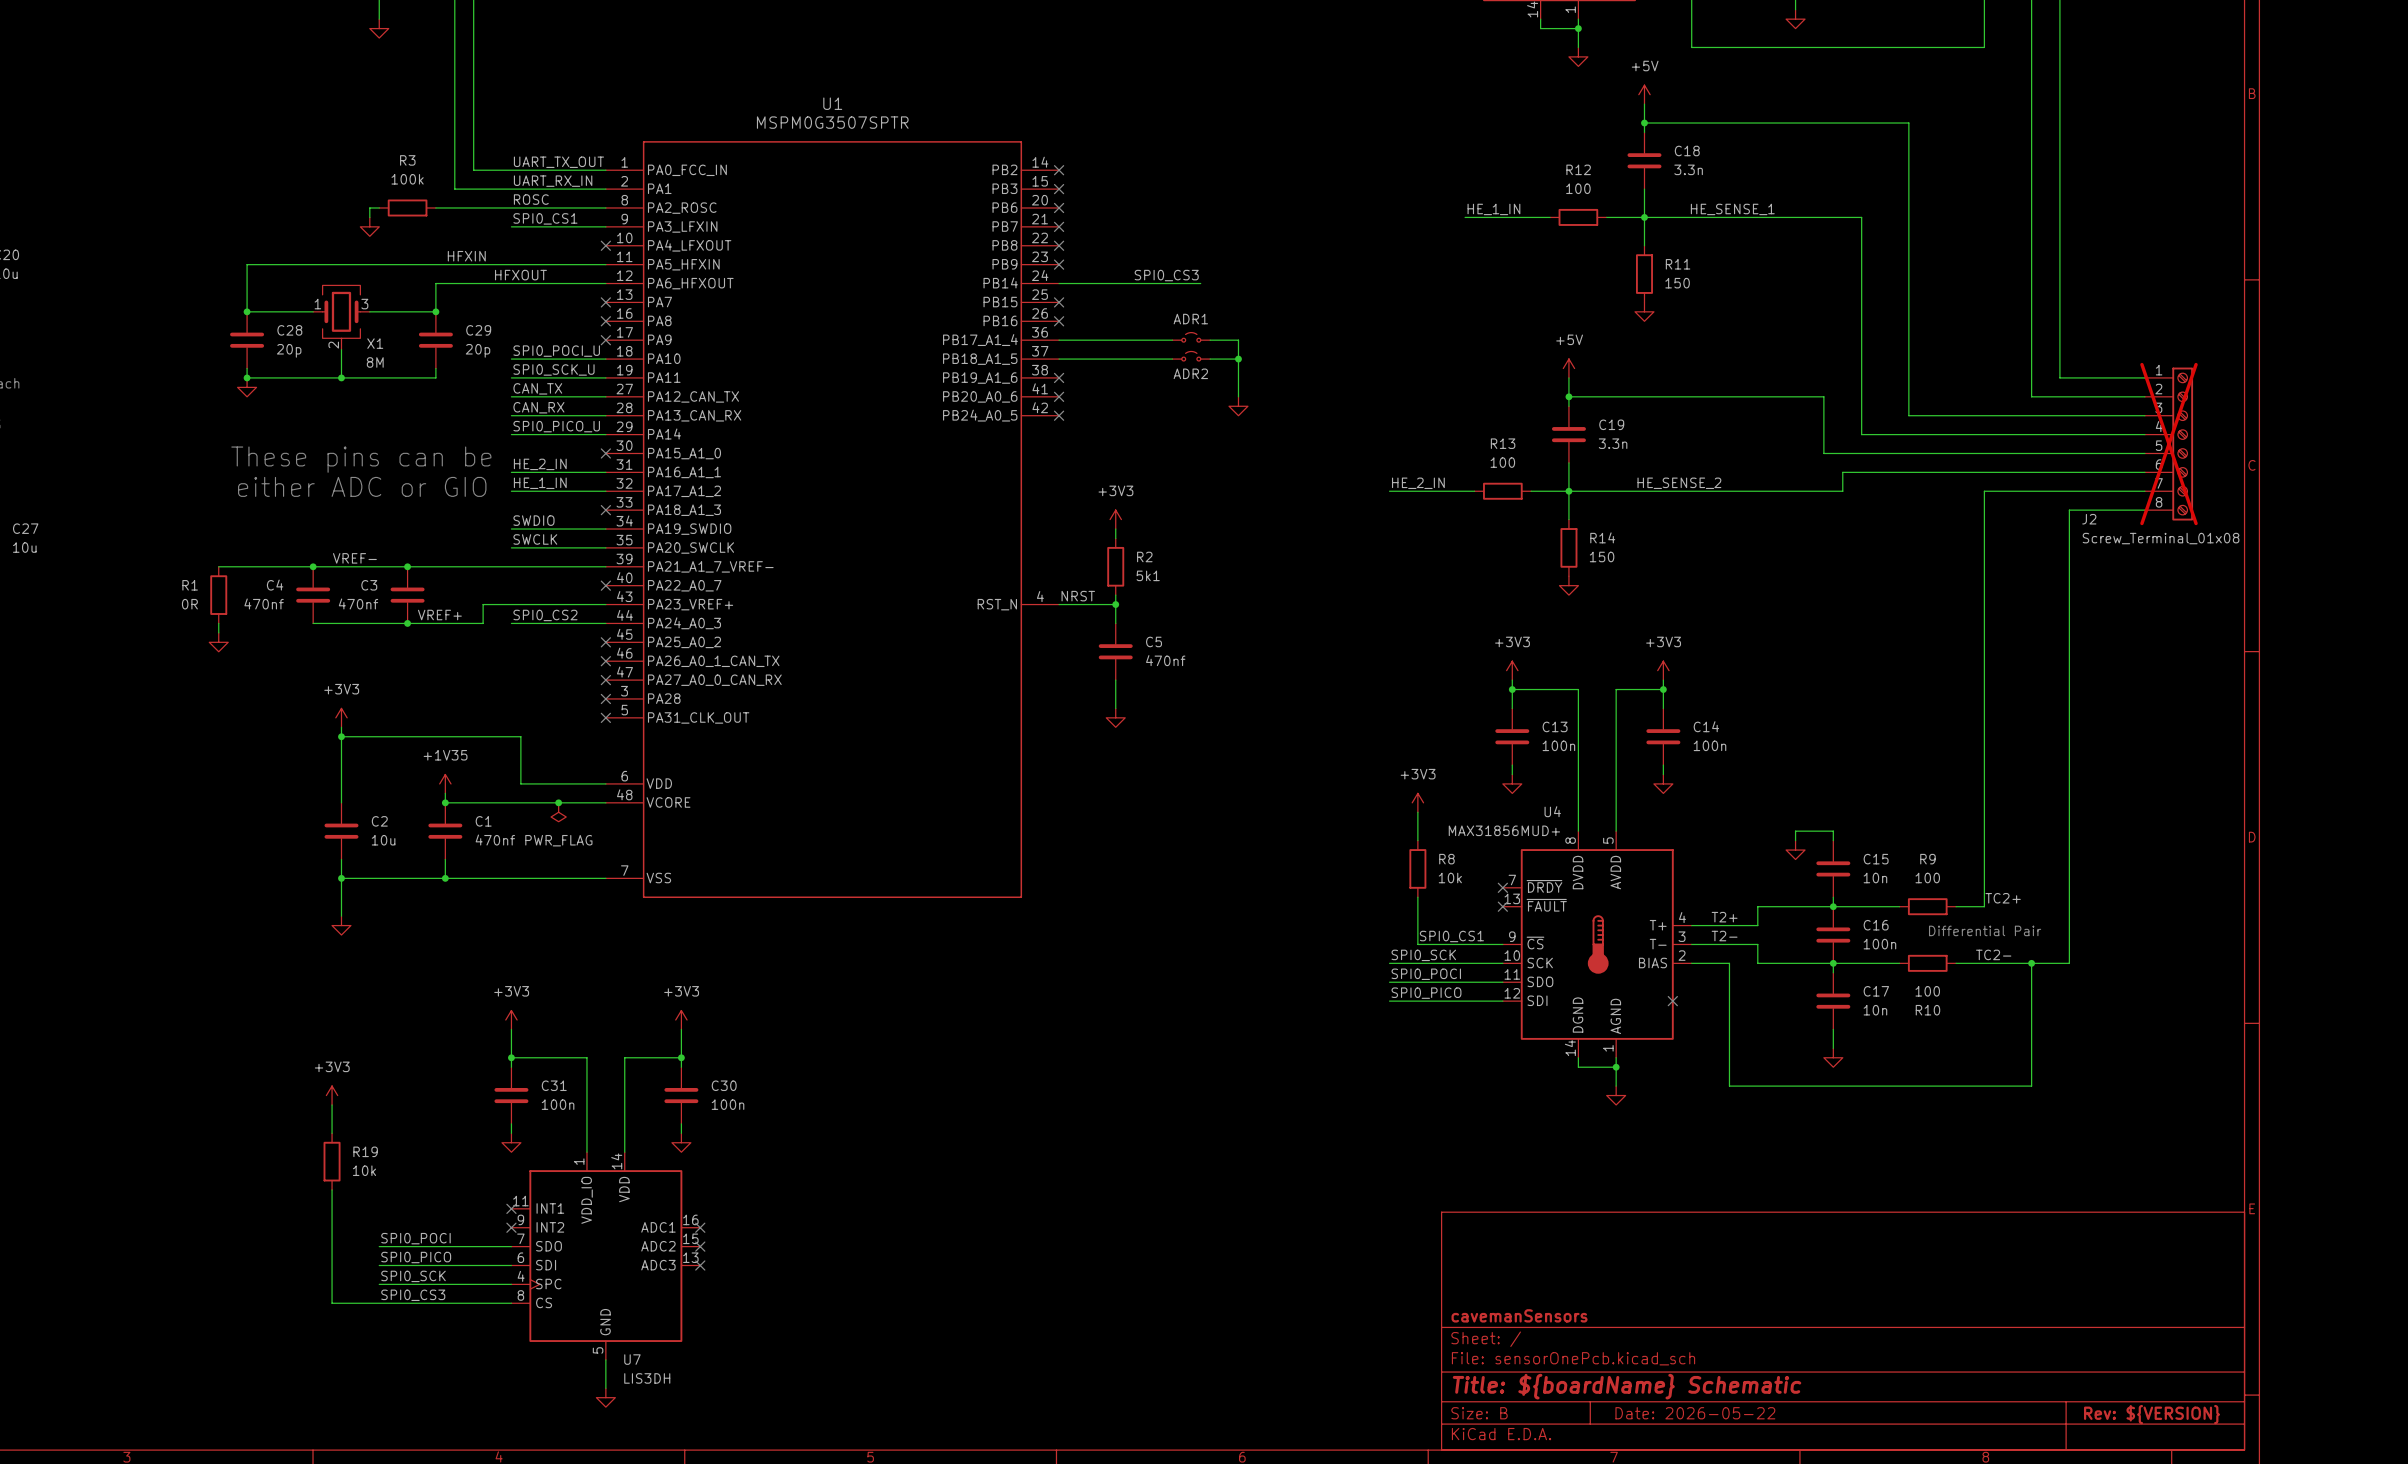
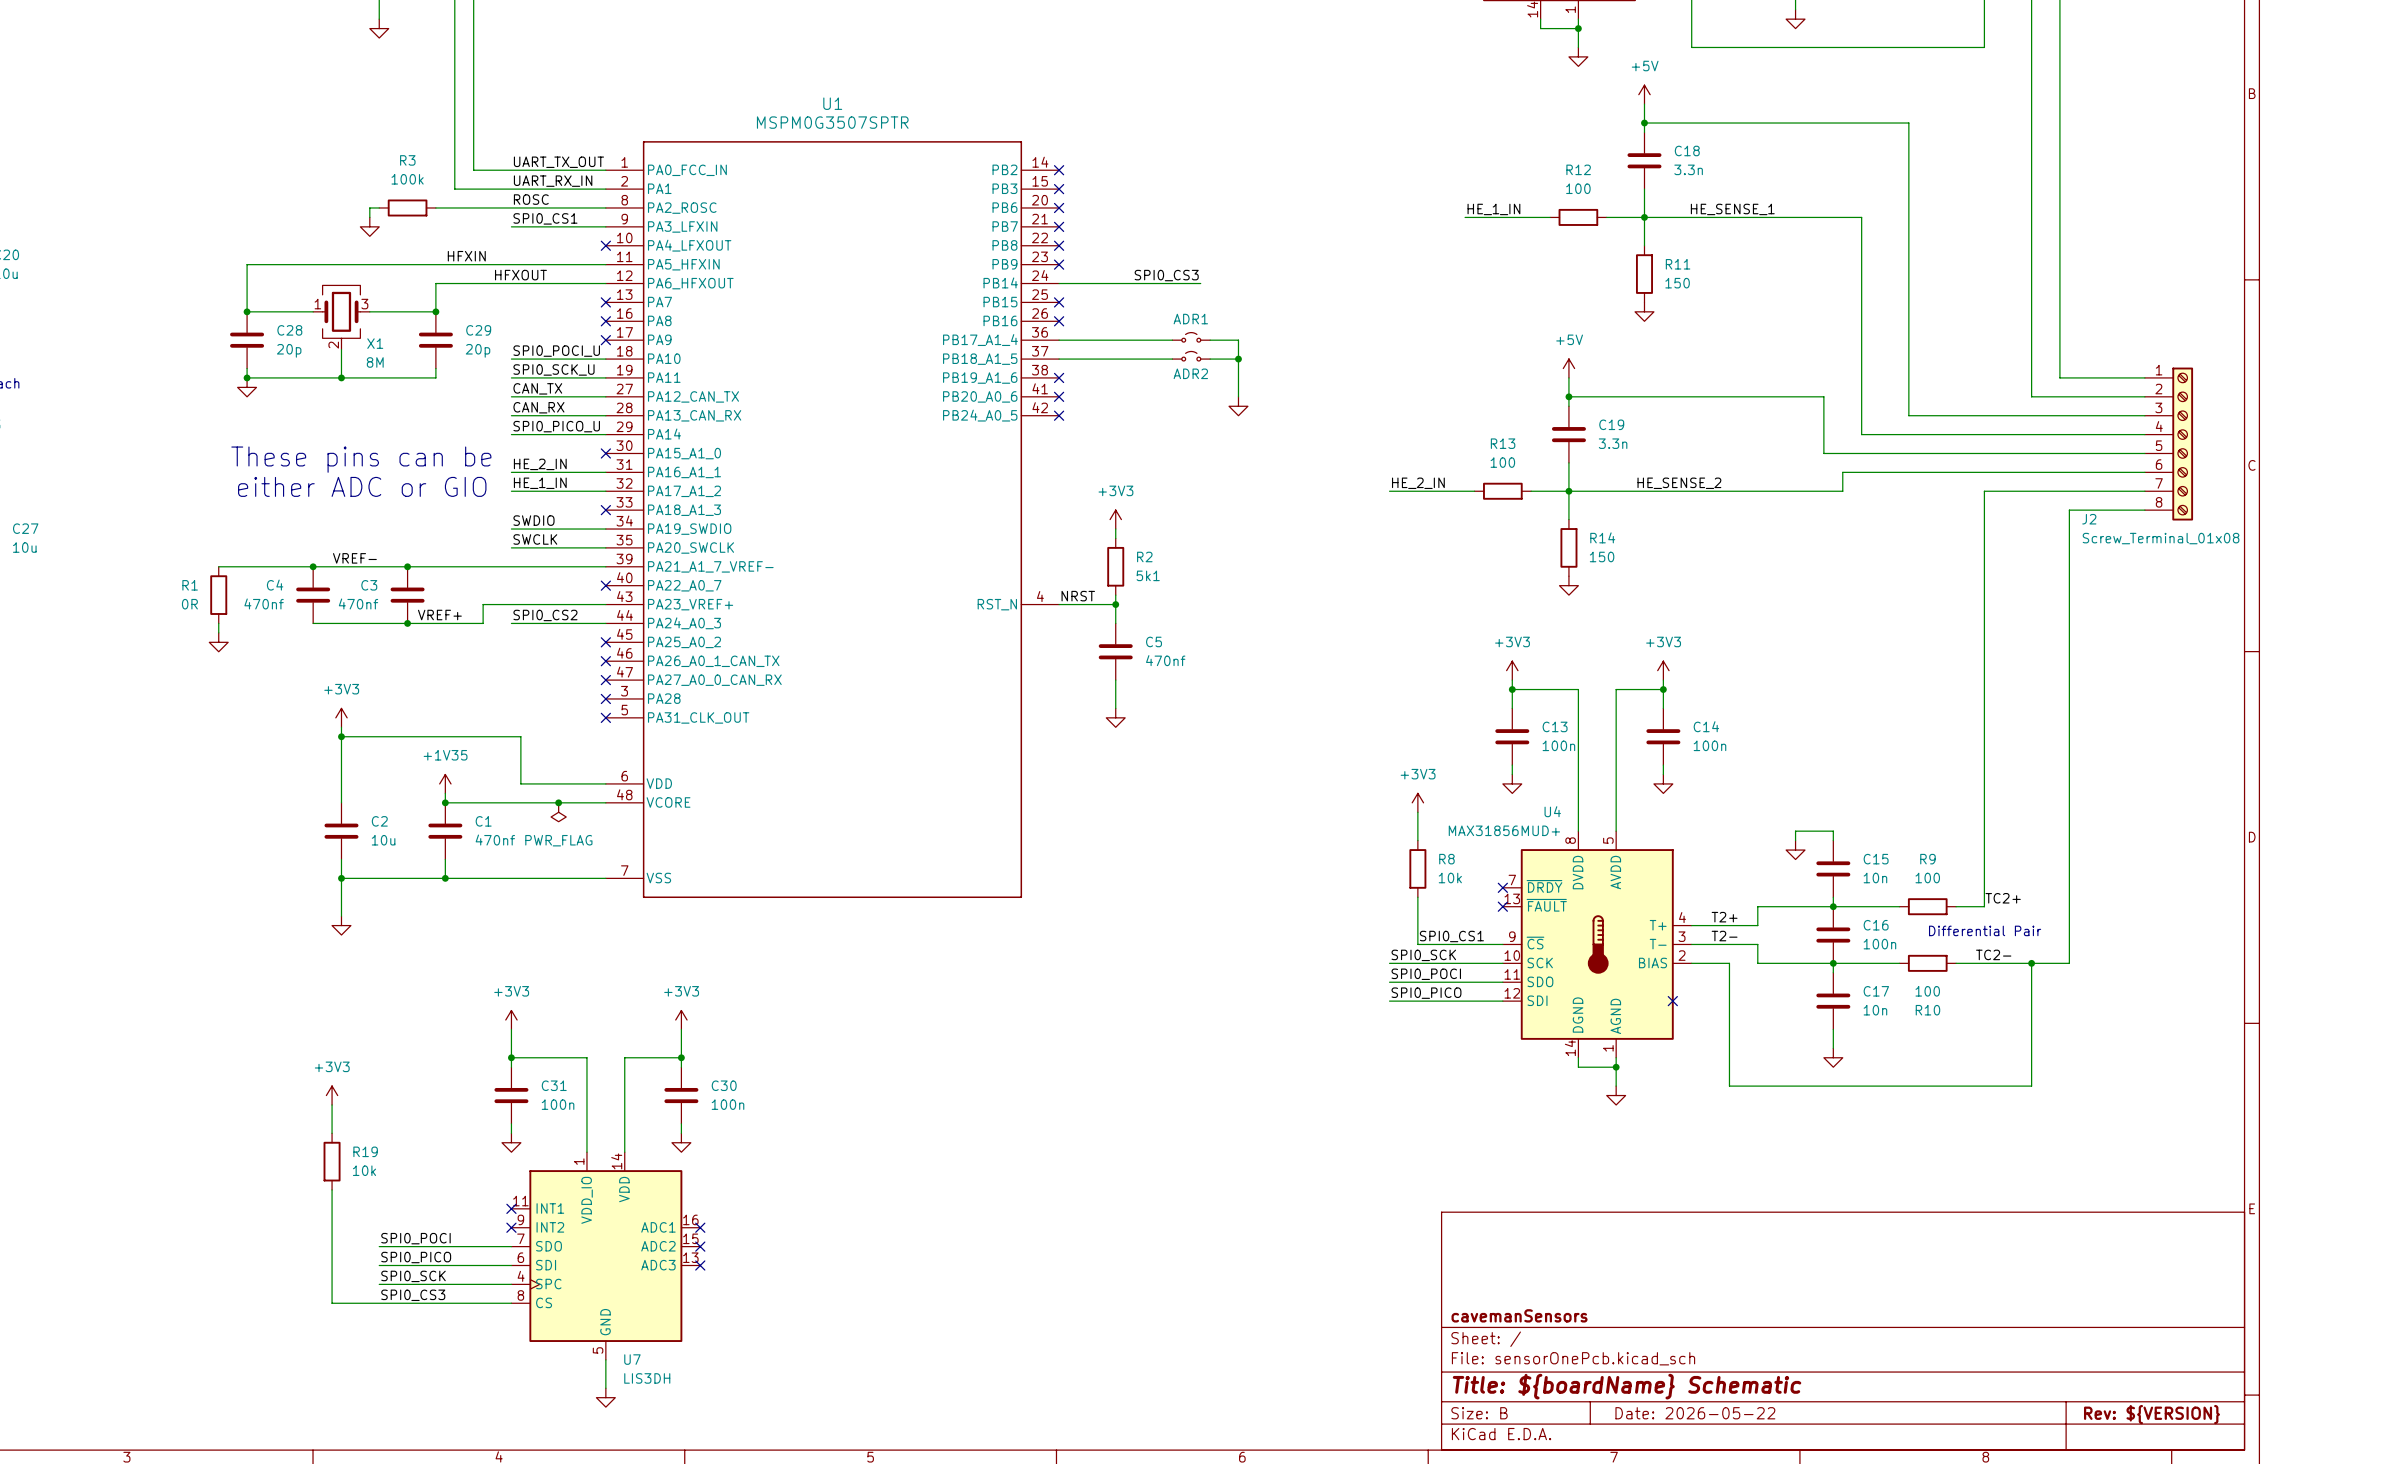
J2 do-not-place cross: (2168, 444) -> none

